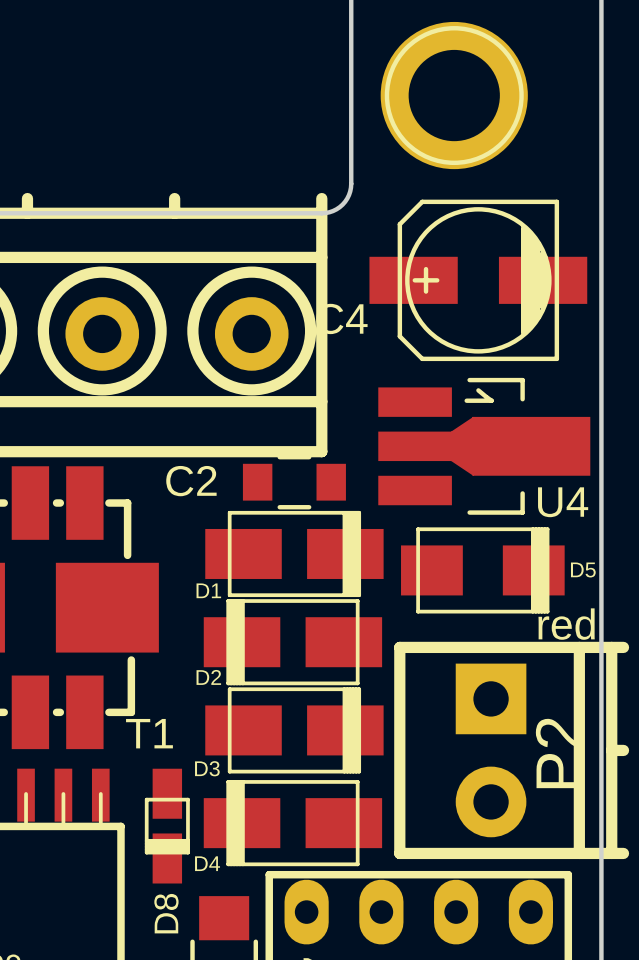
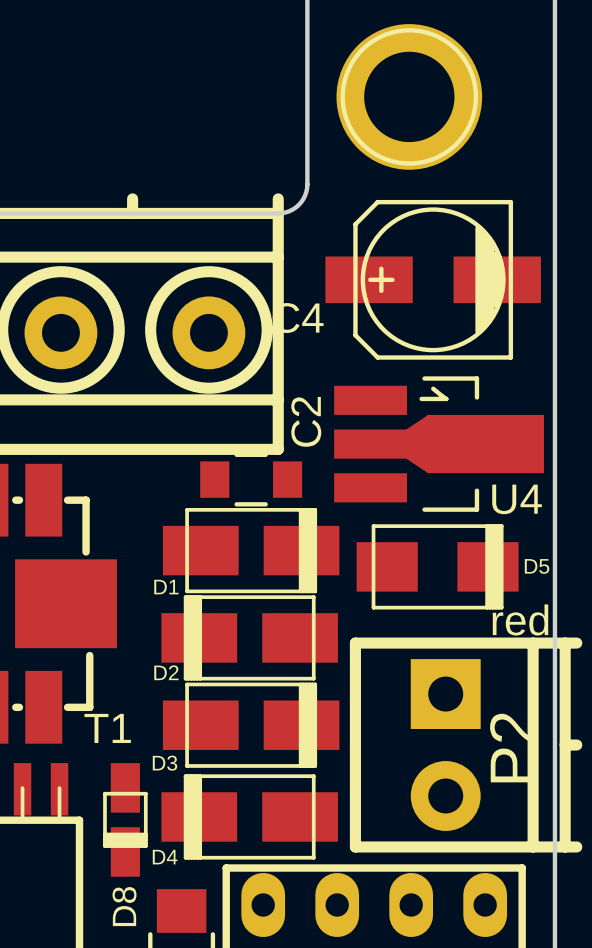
C2 name rotation: 0° (191, 481) -> 90° counterclockwise (306, 421)
C2 name position: C2 (191, 481) -> C2 (306, 421)

